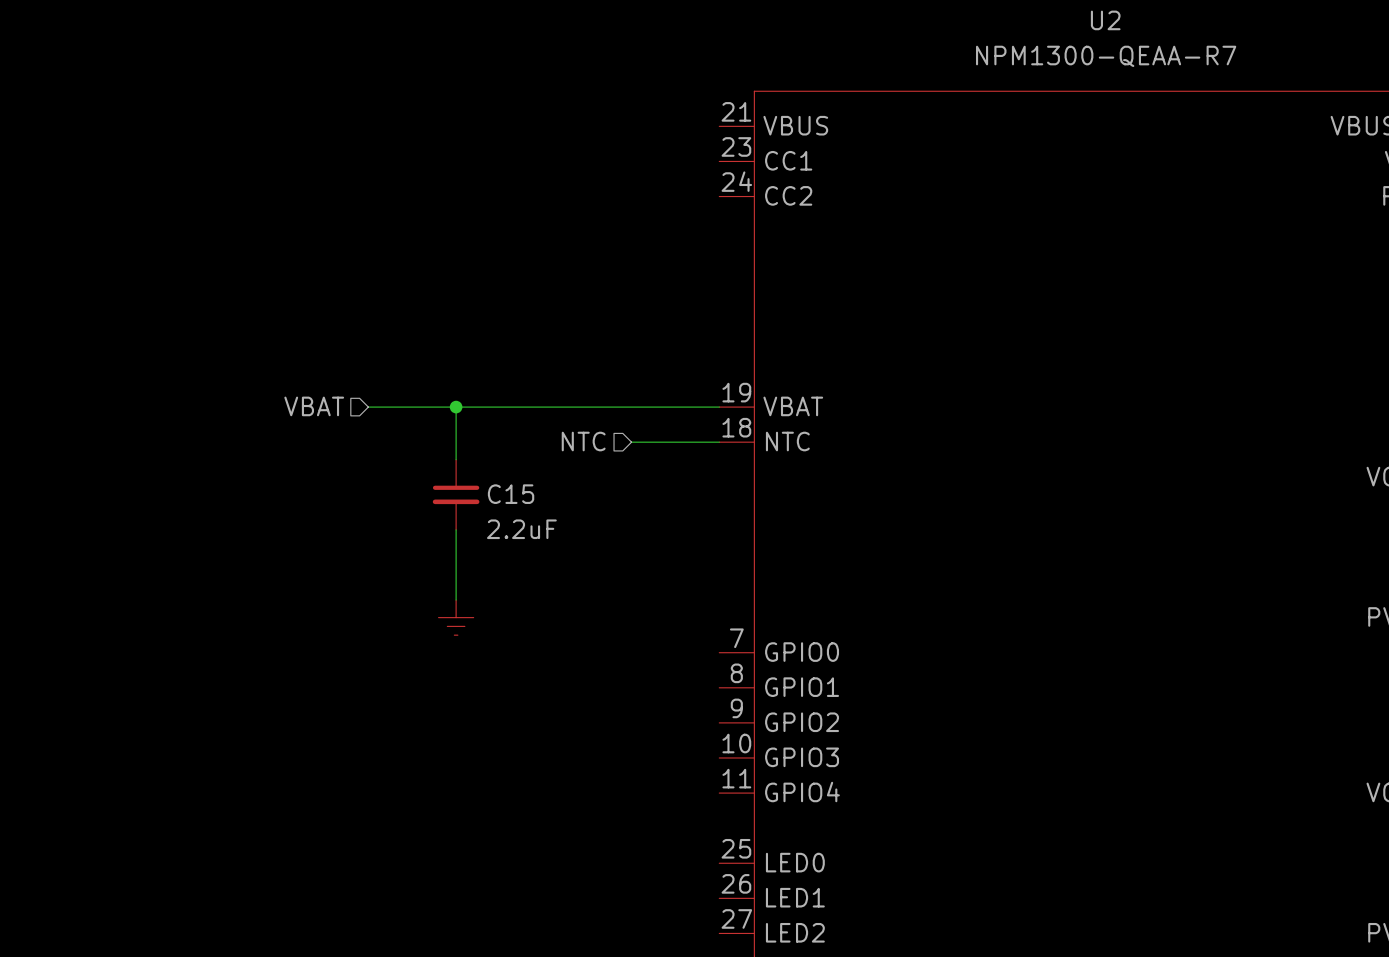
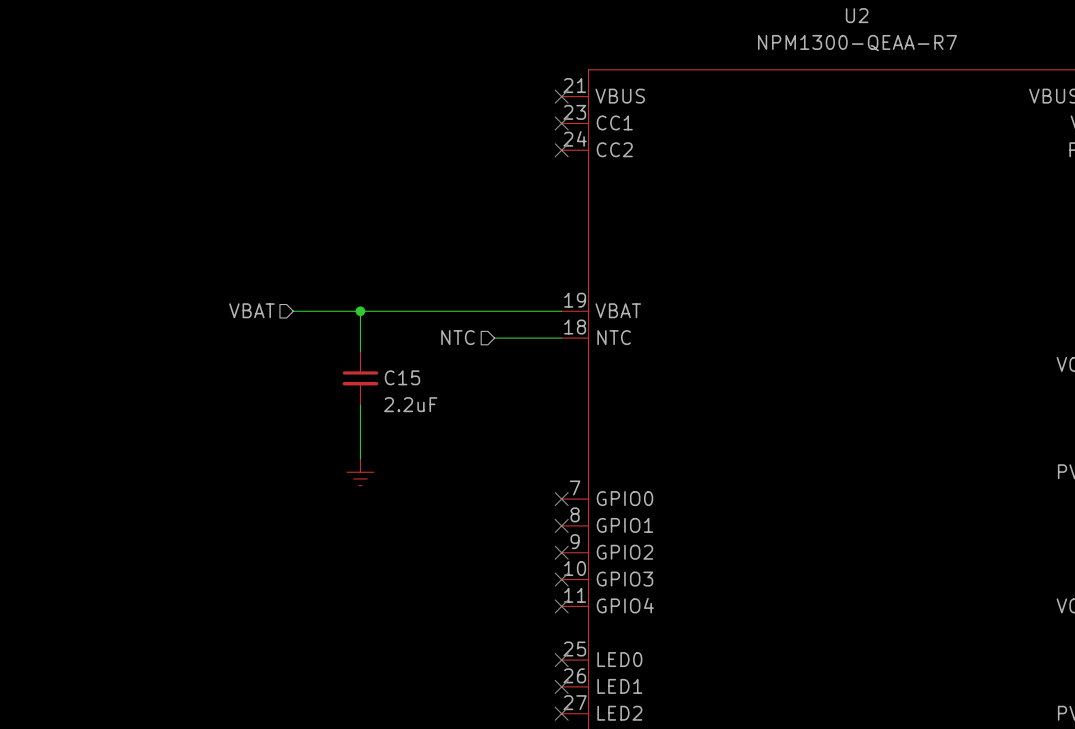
no-connect mark: none -> (561, 96)
no-connect mark: none -> (561, 123)
no-connect mark: none -> (561, 150)
no-connect mark: none -> (561, 499)
no-connect mark: none -> (561, 525)
no-connect mark: none -> (561, 552)
no-connect mark: none -> (561, 579)
no-connect mark: none -> (561, 606)
no-connect mark: none -> (561, 660)
no-connect mark: none -> (561, 686)
no-connect mark: none -> (561, 713)

